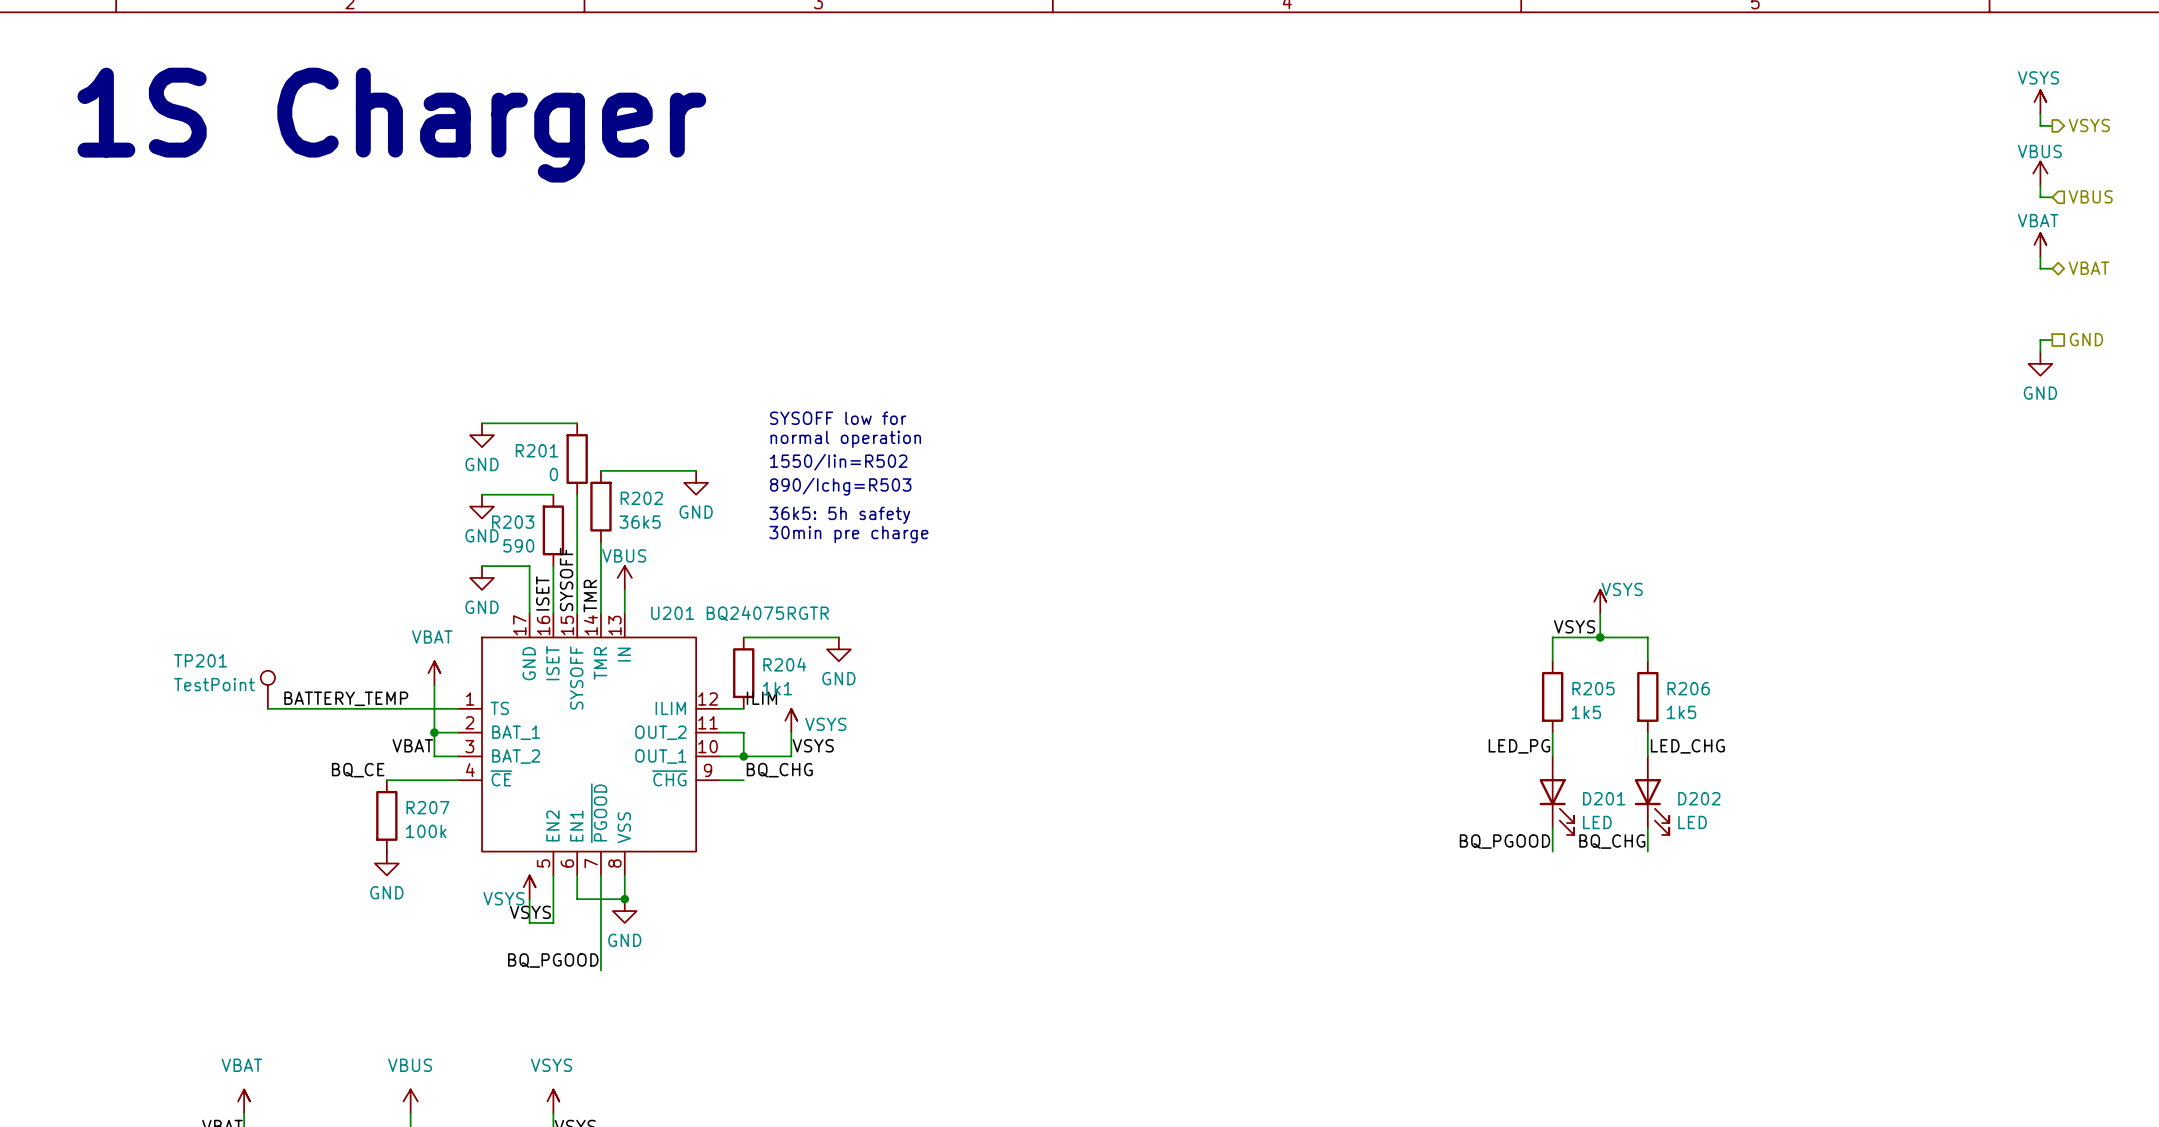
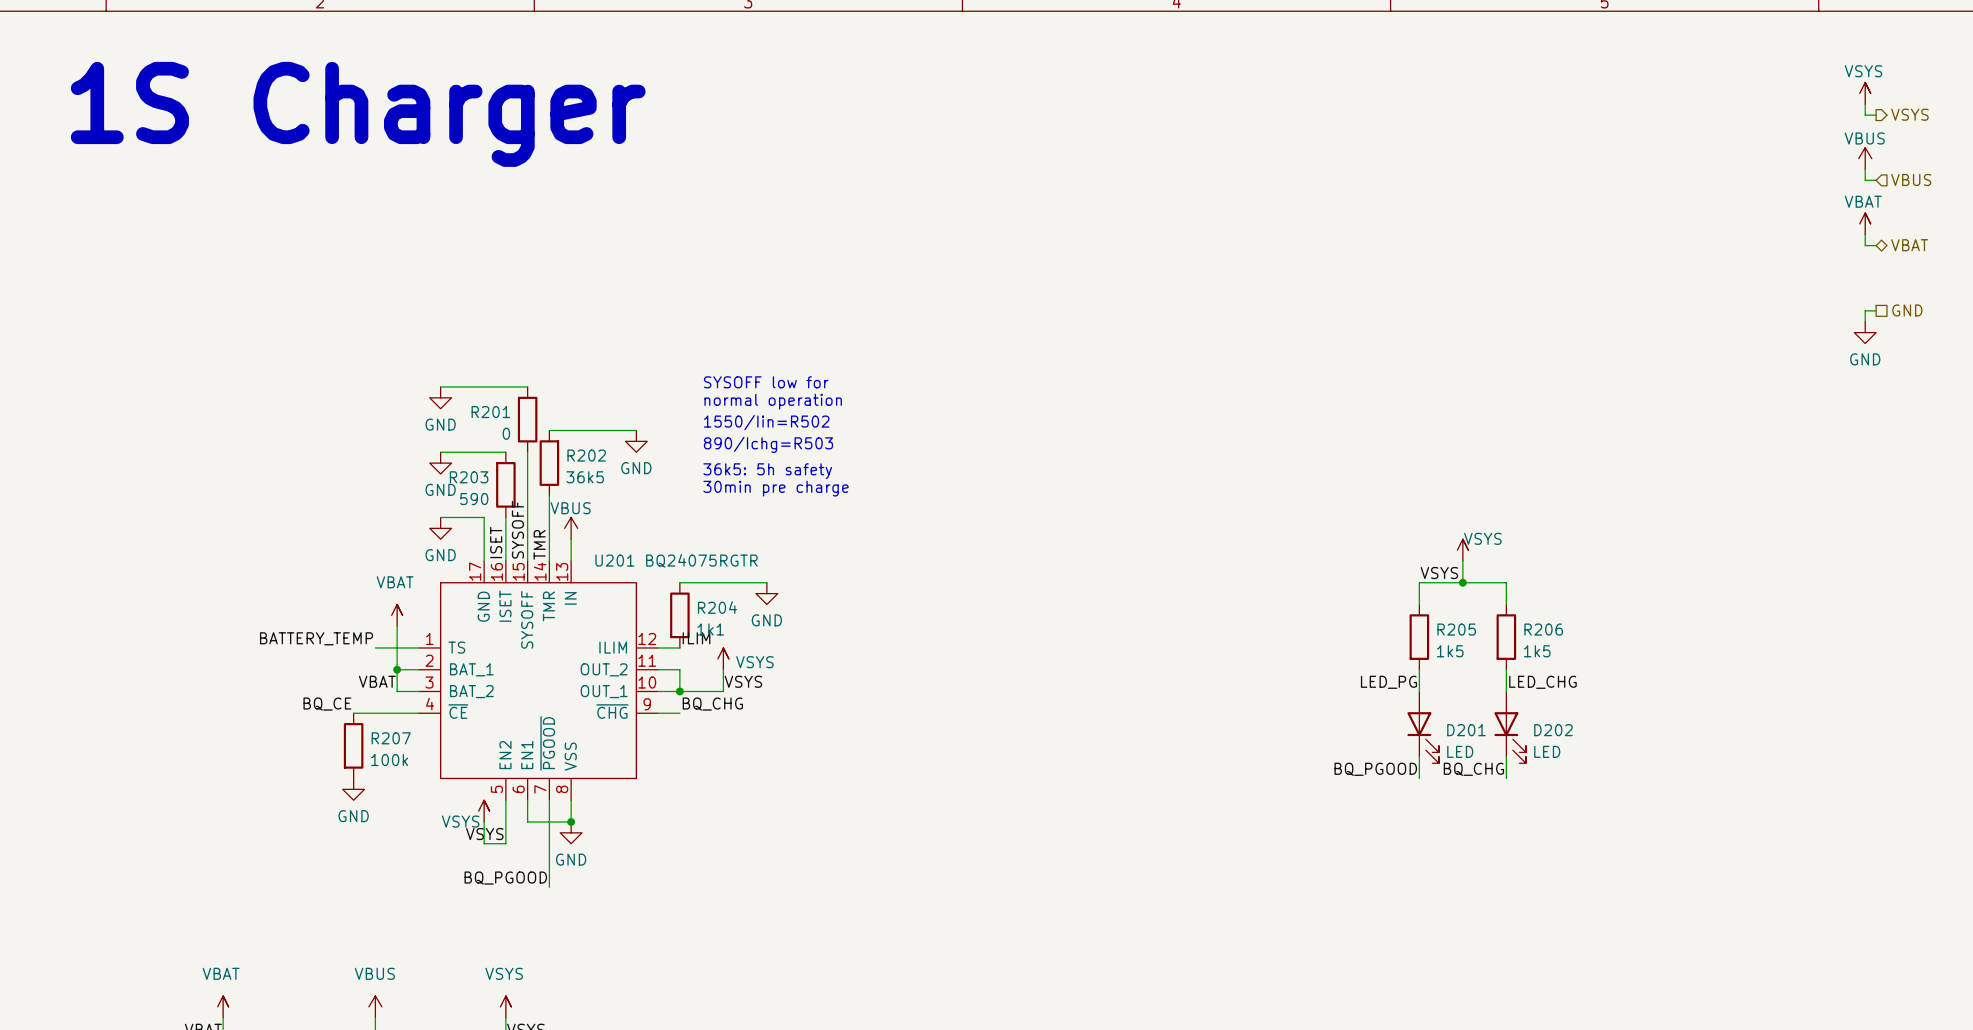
TP201: TestPoint (267, 689) -> none
wire: (267, 708) (410, 708) -> none

